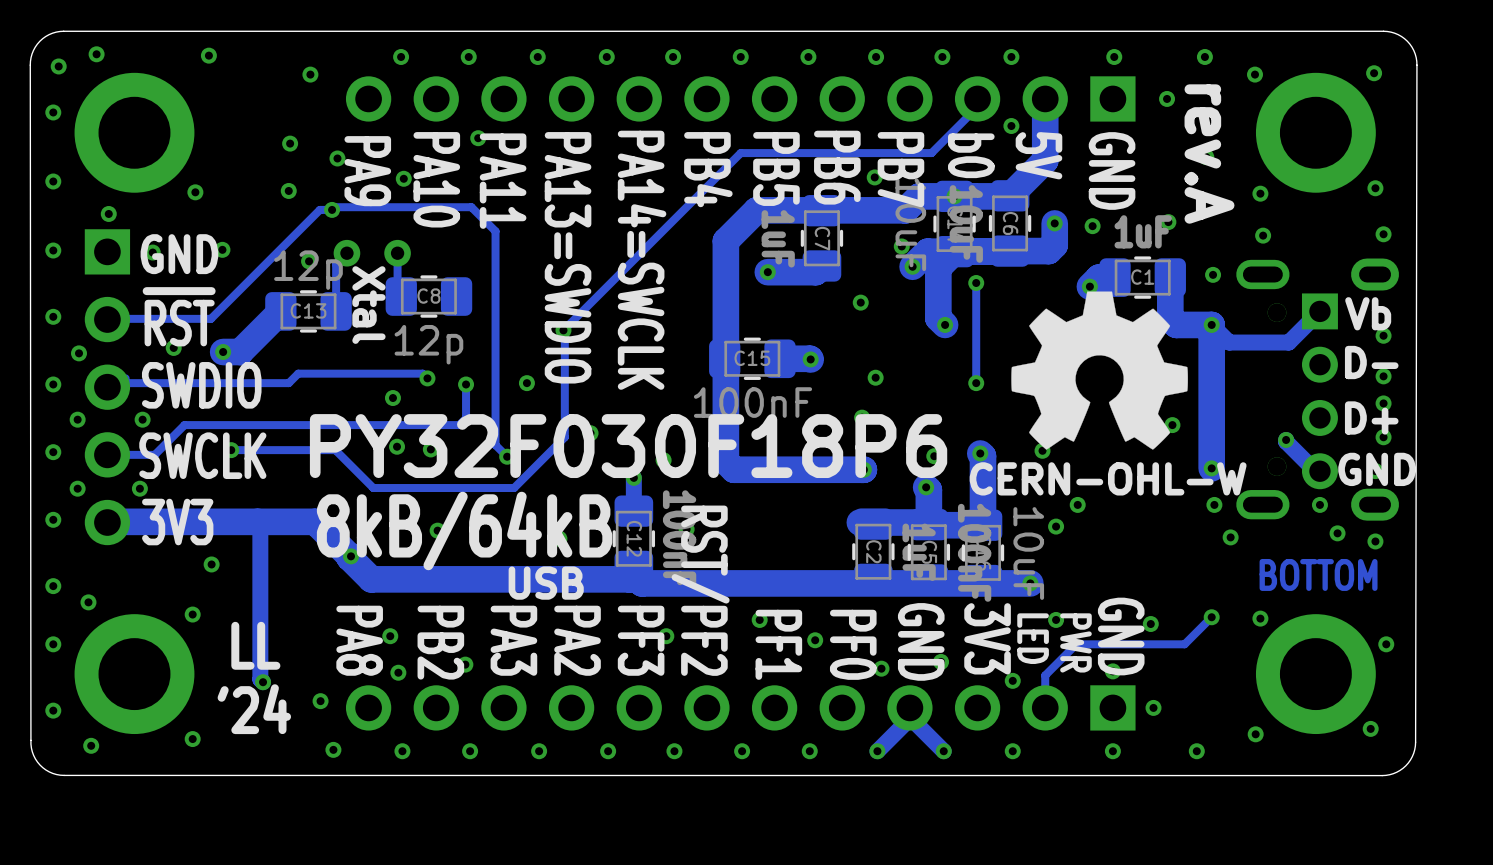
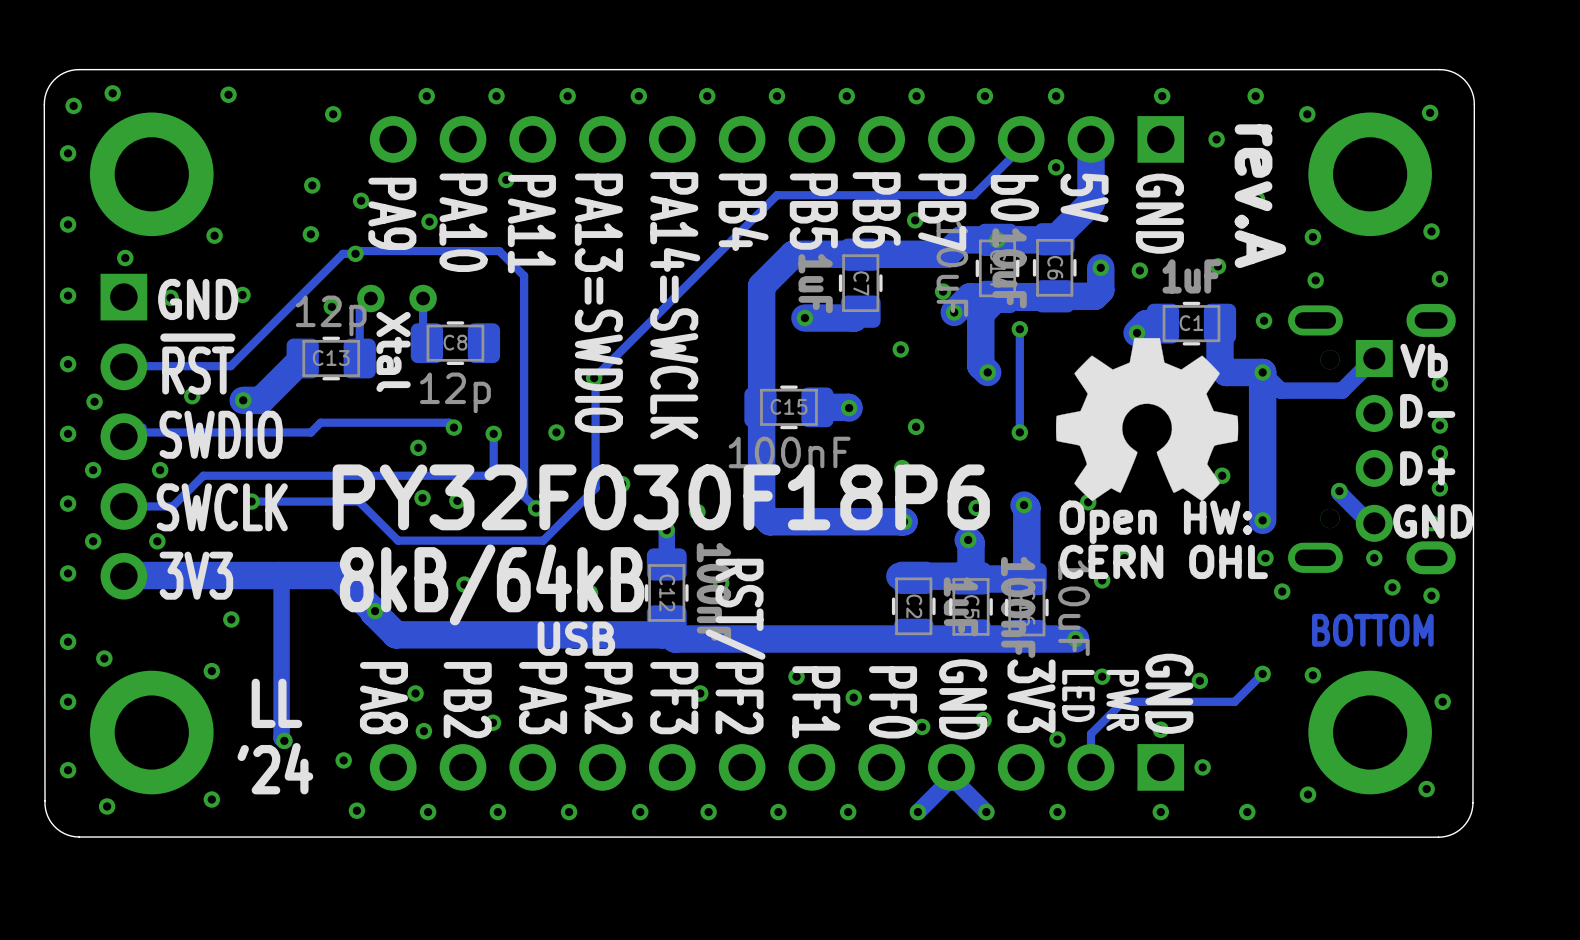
text: none -> Open HW: (1155, 522)
text: CERN-OHL-W (1108, 478) -> CERN OHL (1163, 561)

